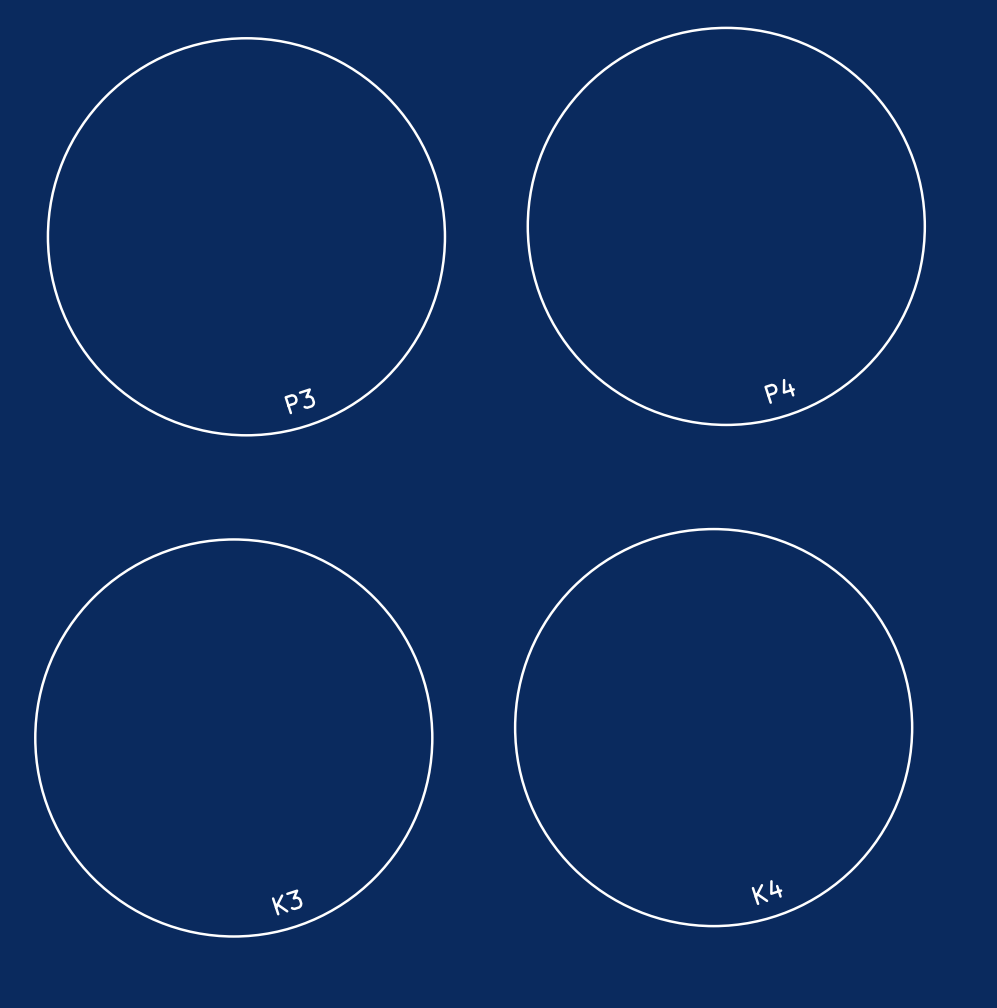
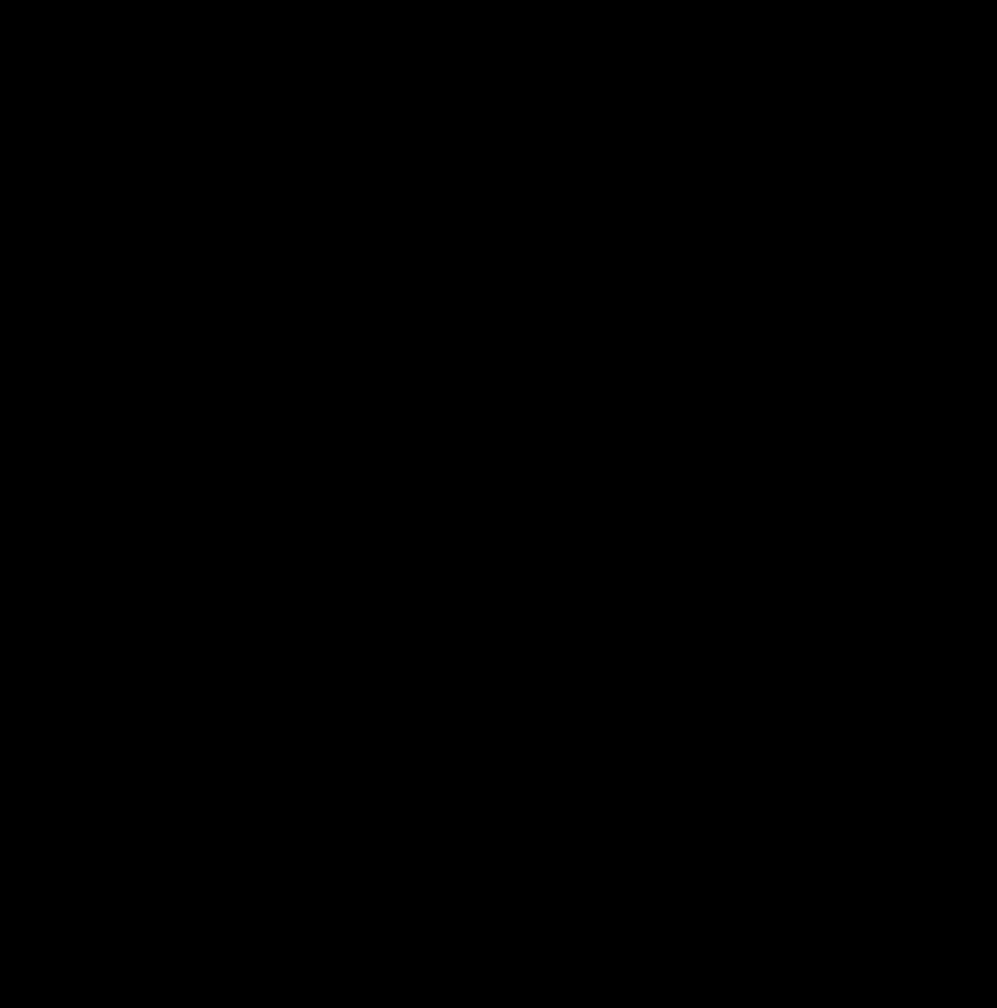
drawing: [526, 26, 927, 427] -> none
drawing: [46, 37, 447, 437] -> none
text: P4 (779, 391) -> none
text: P3 (299, 401) -> none
drawing: [513, 527, 914, 928] -> none
drawing: [34, 538, 434, 938] -> none
text: K4 (767, 892) -> none
text: K3 (287, 902) -> none

